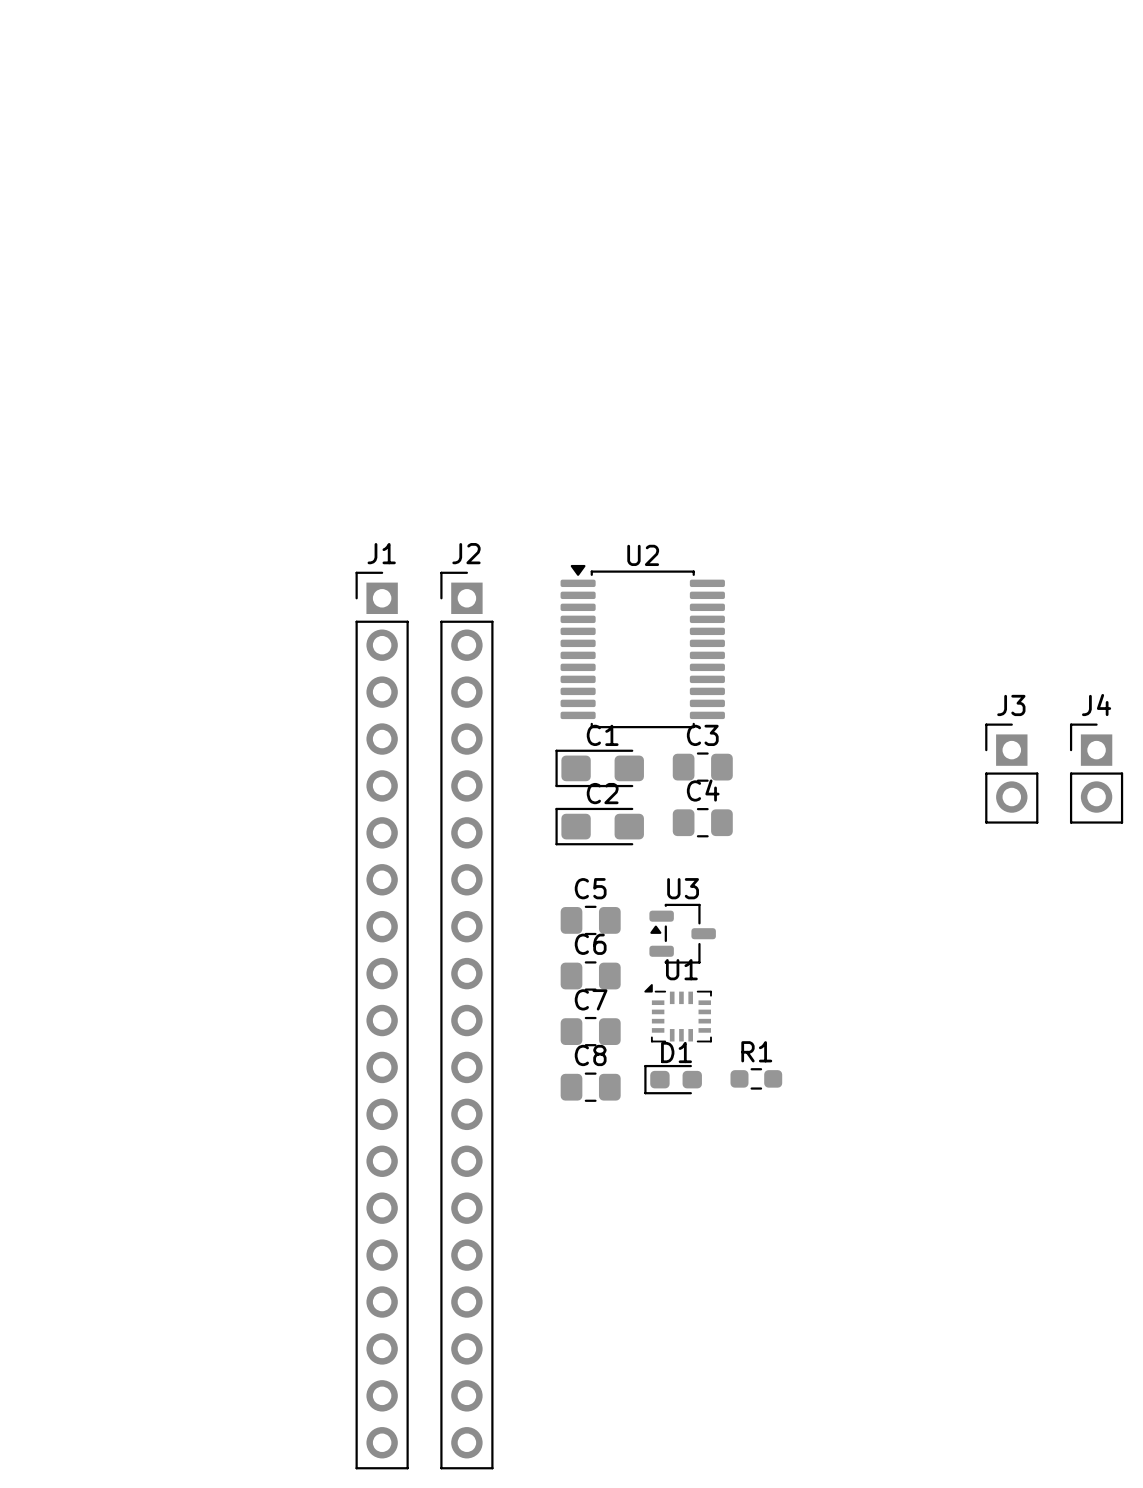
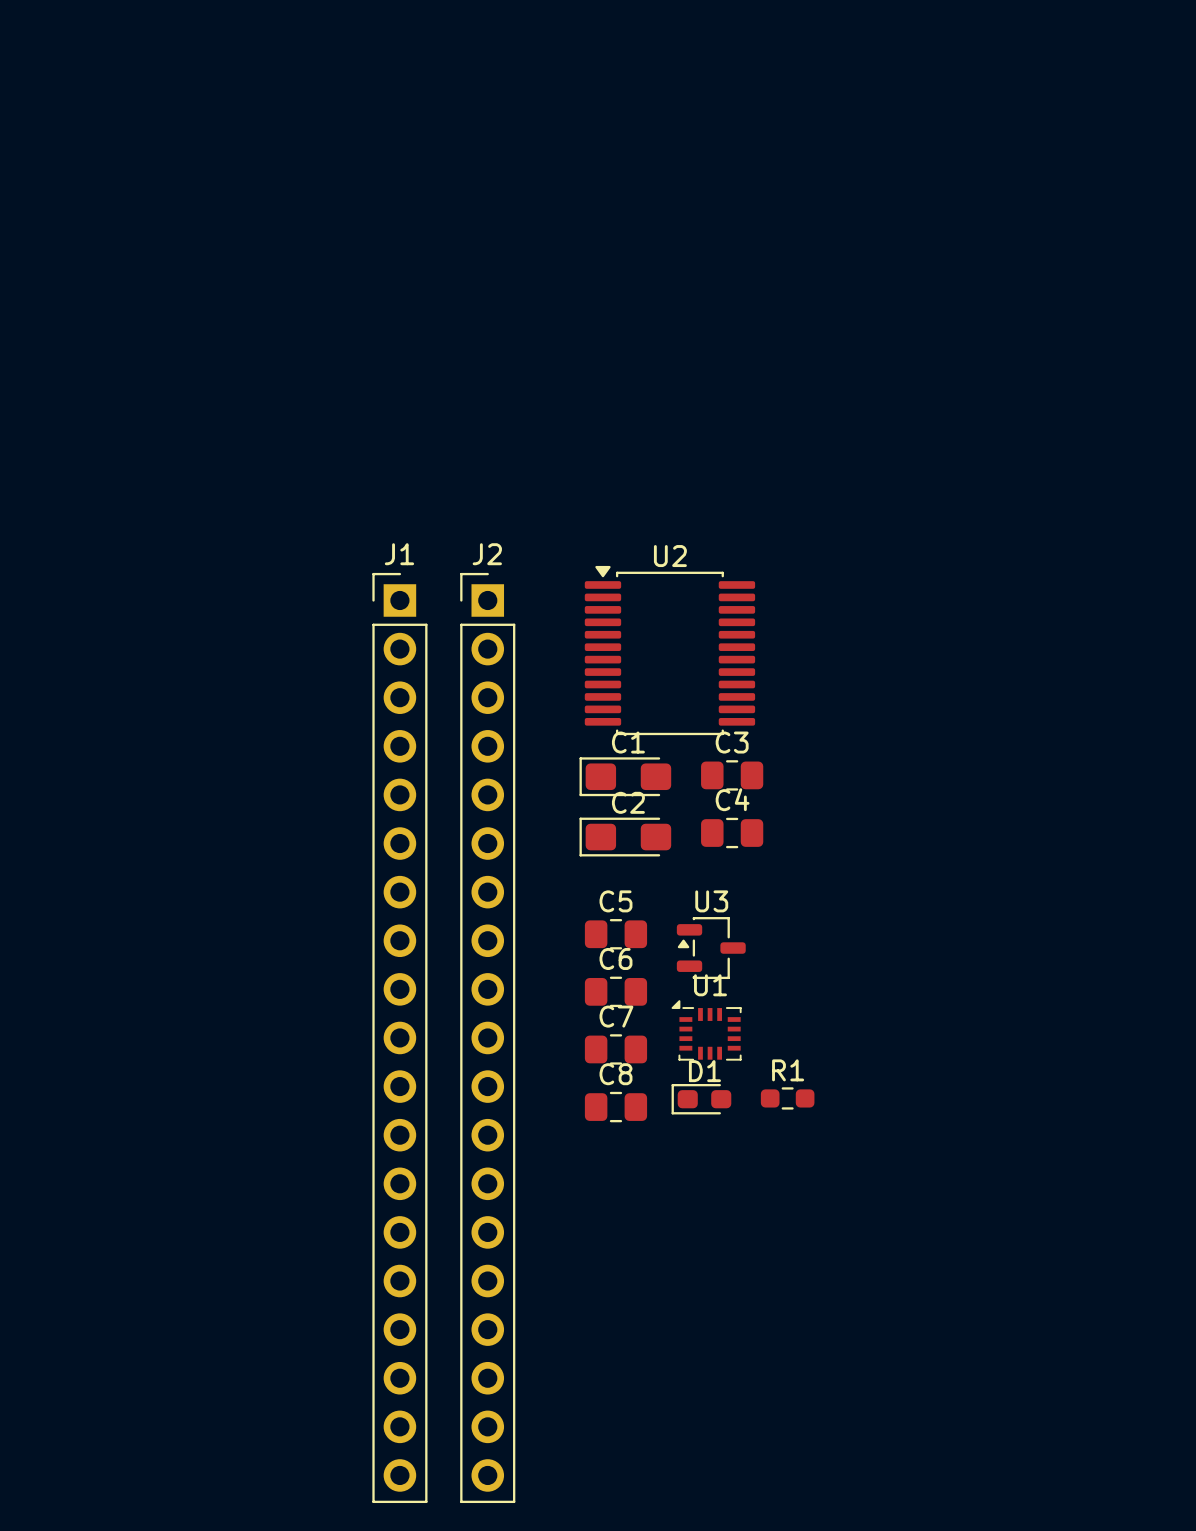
J3: (1011, 773) -> none
J4: (1096, 773) -> none

